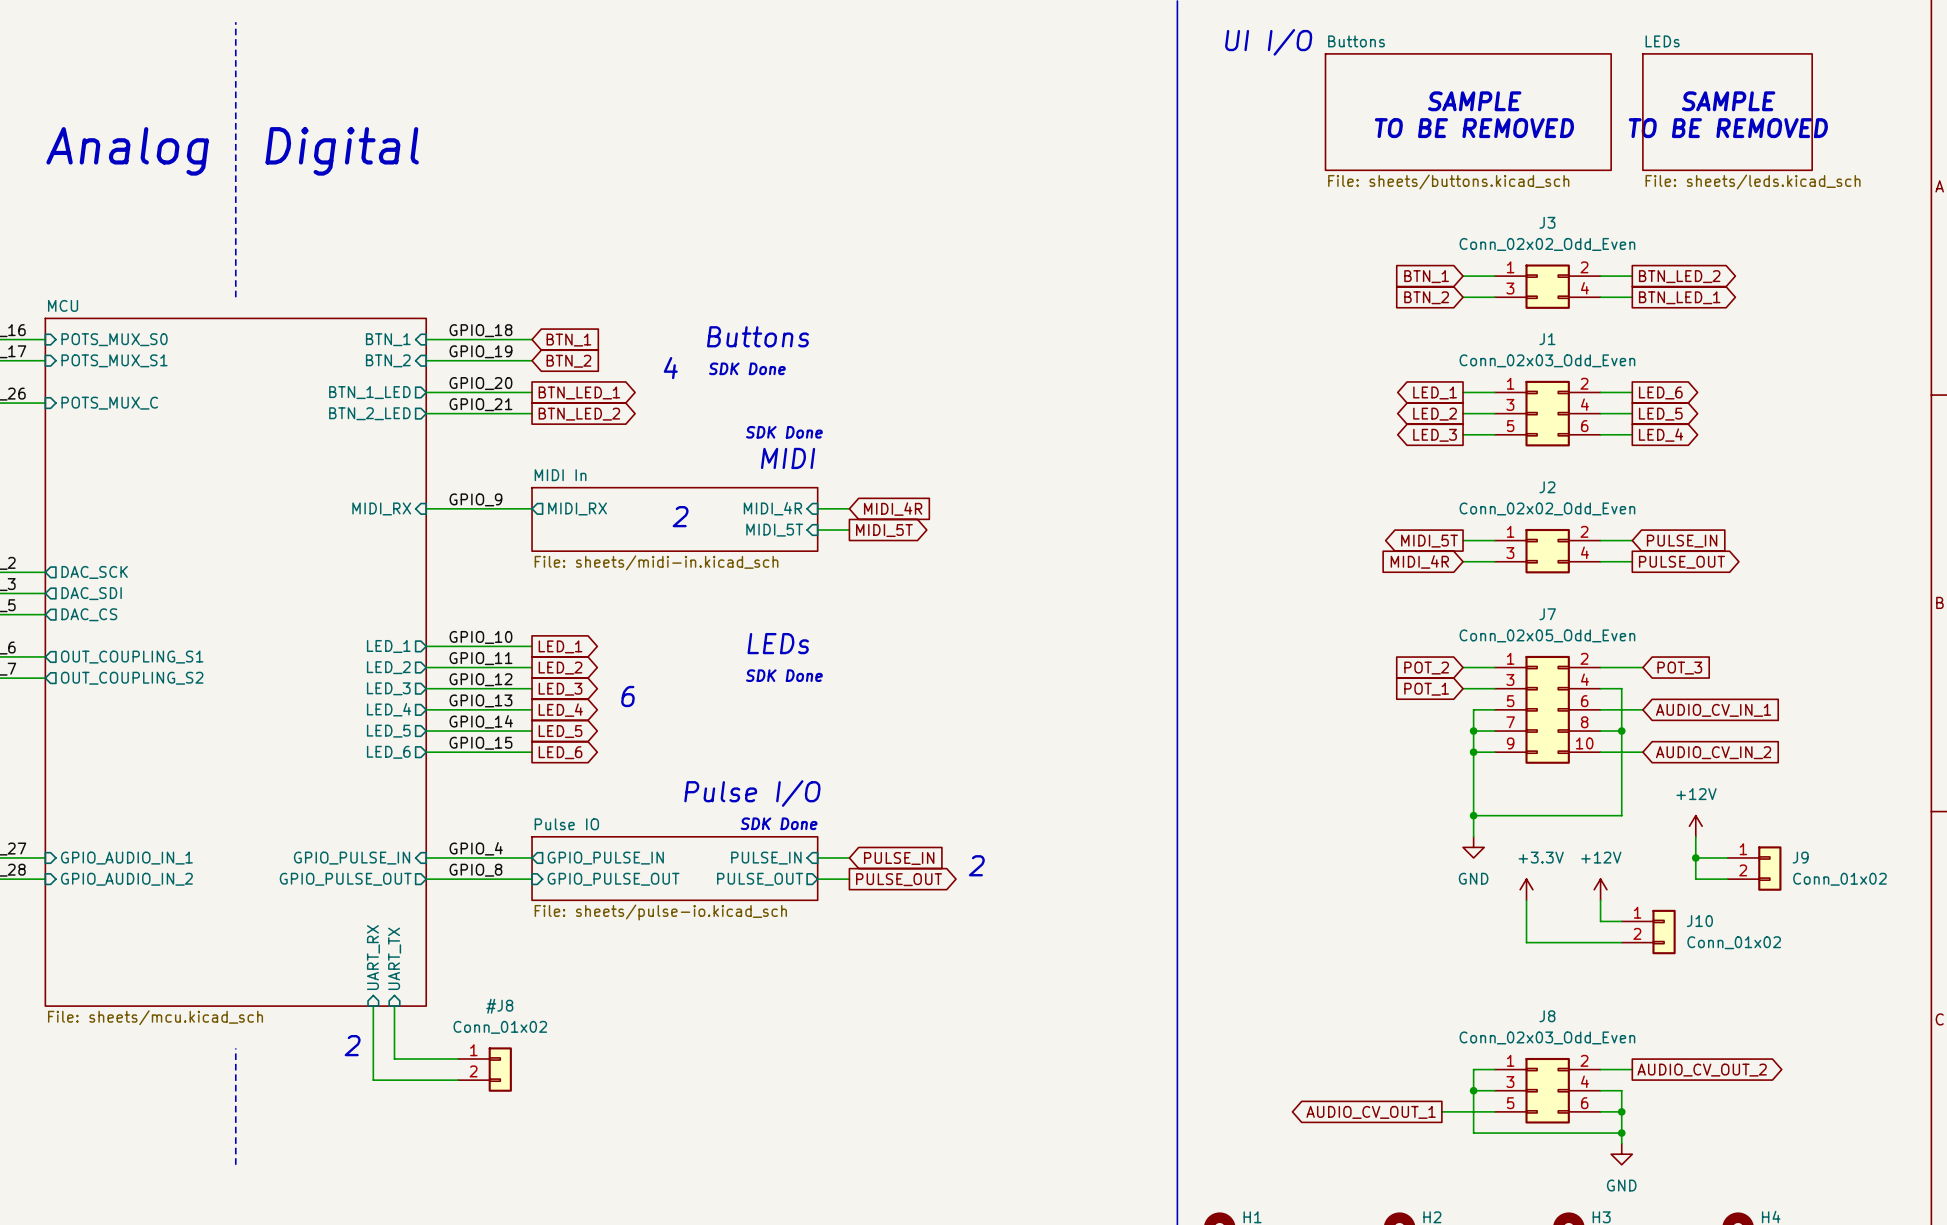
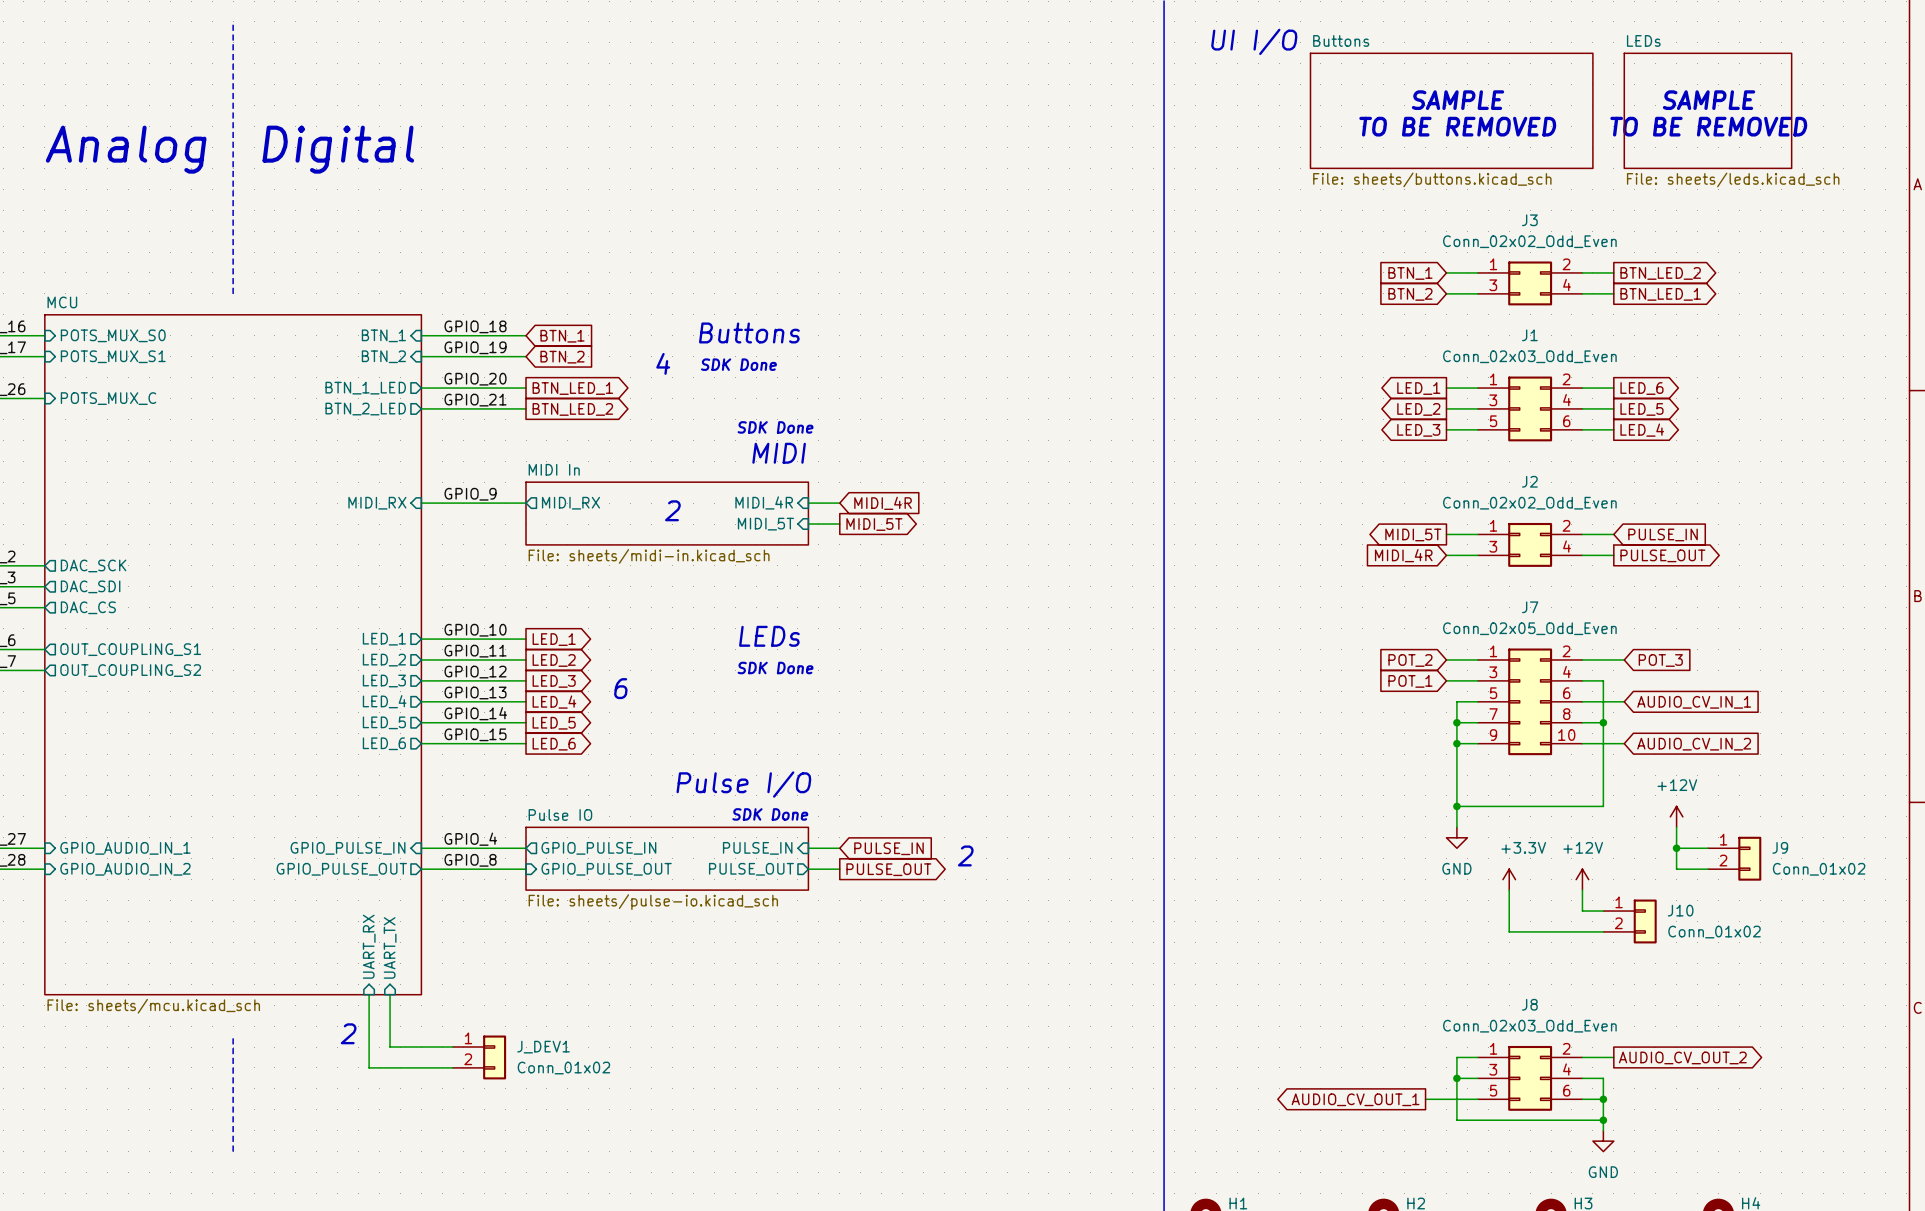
#J8: Conn_01x02 (484, 1069) -> none
J_DEV1: none -> Conn_01x02 (479, 1057)

